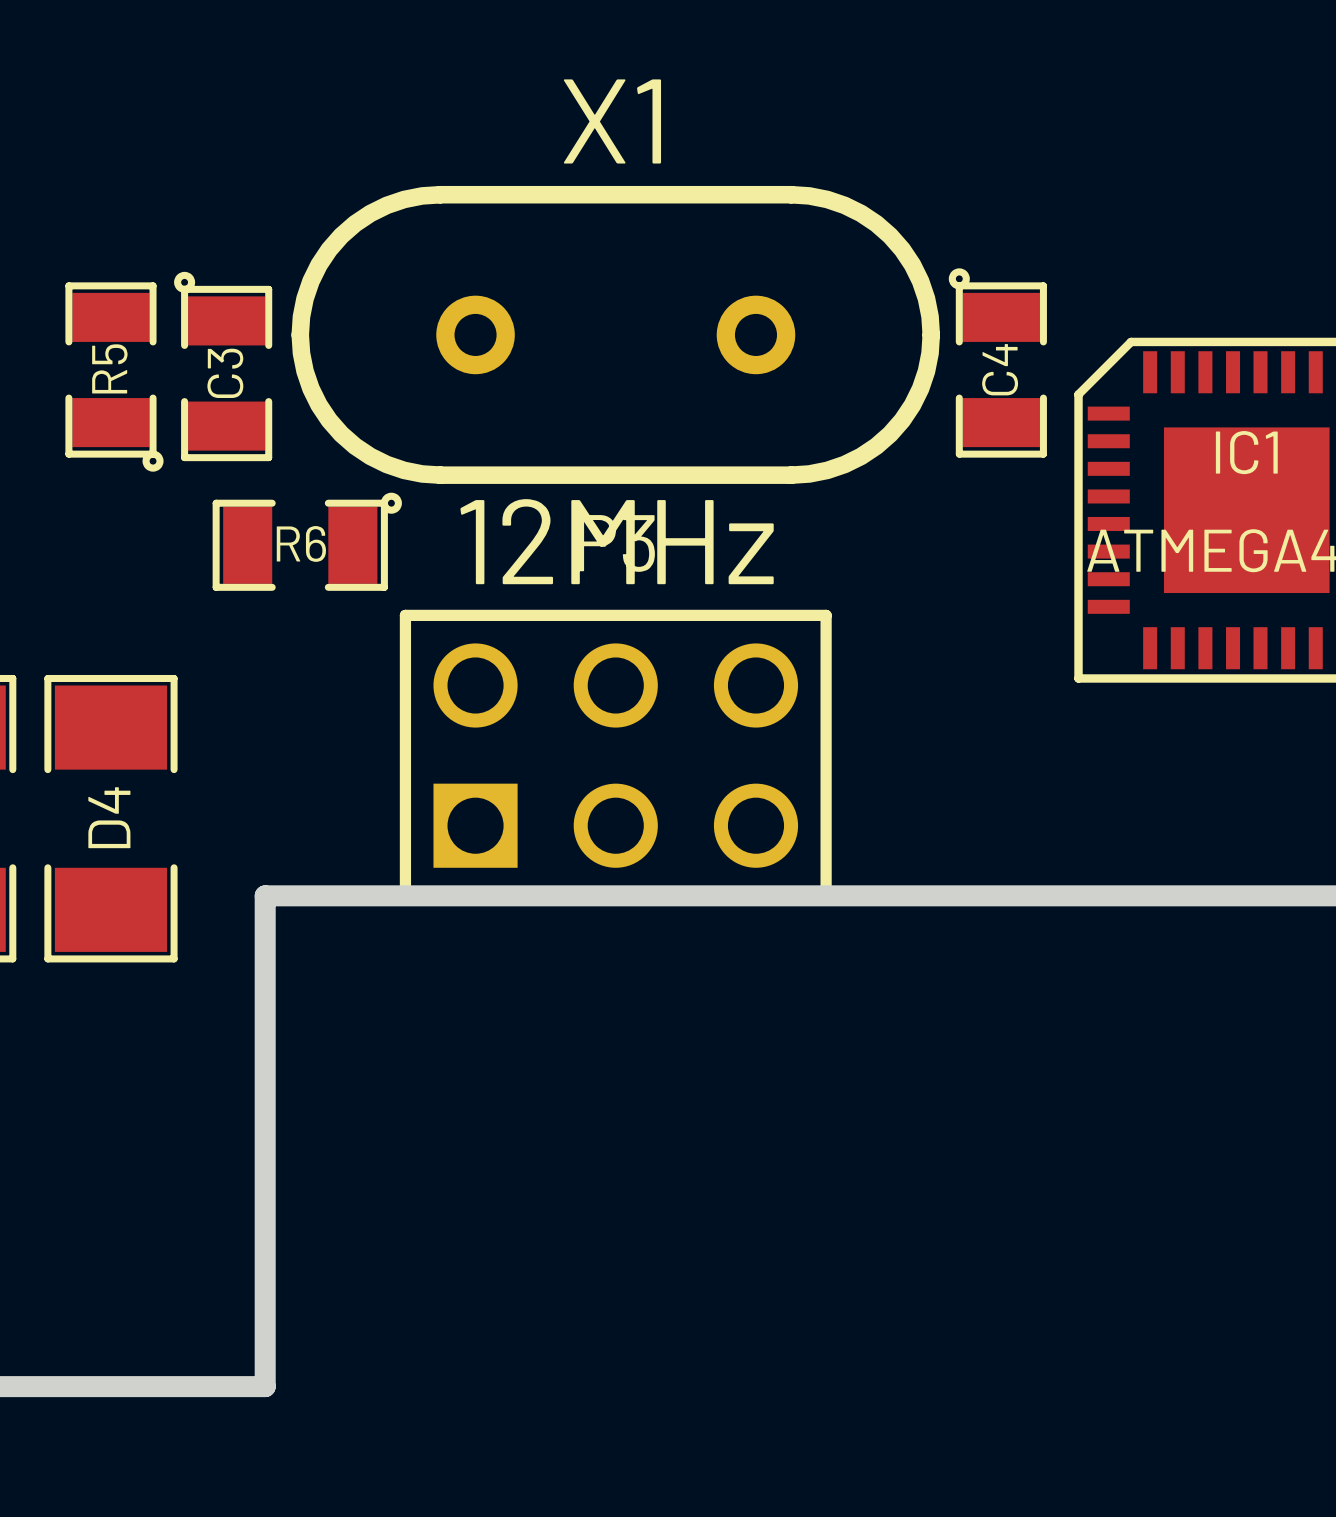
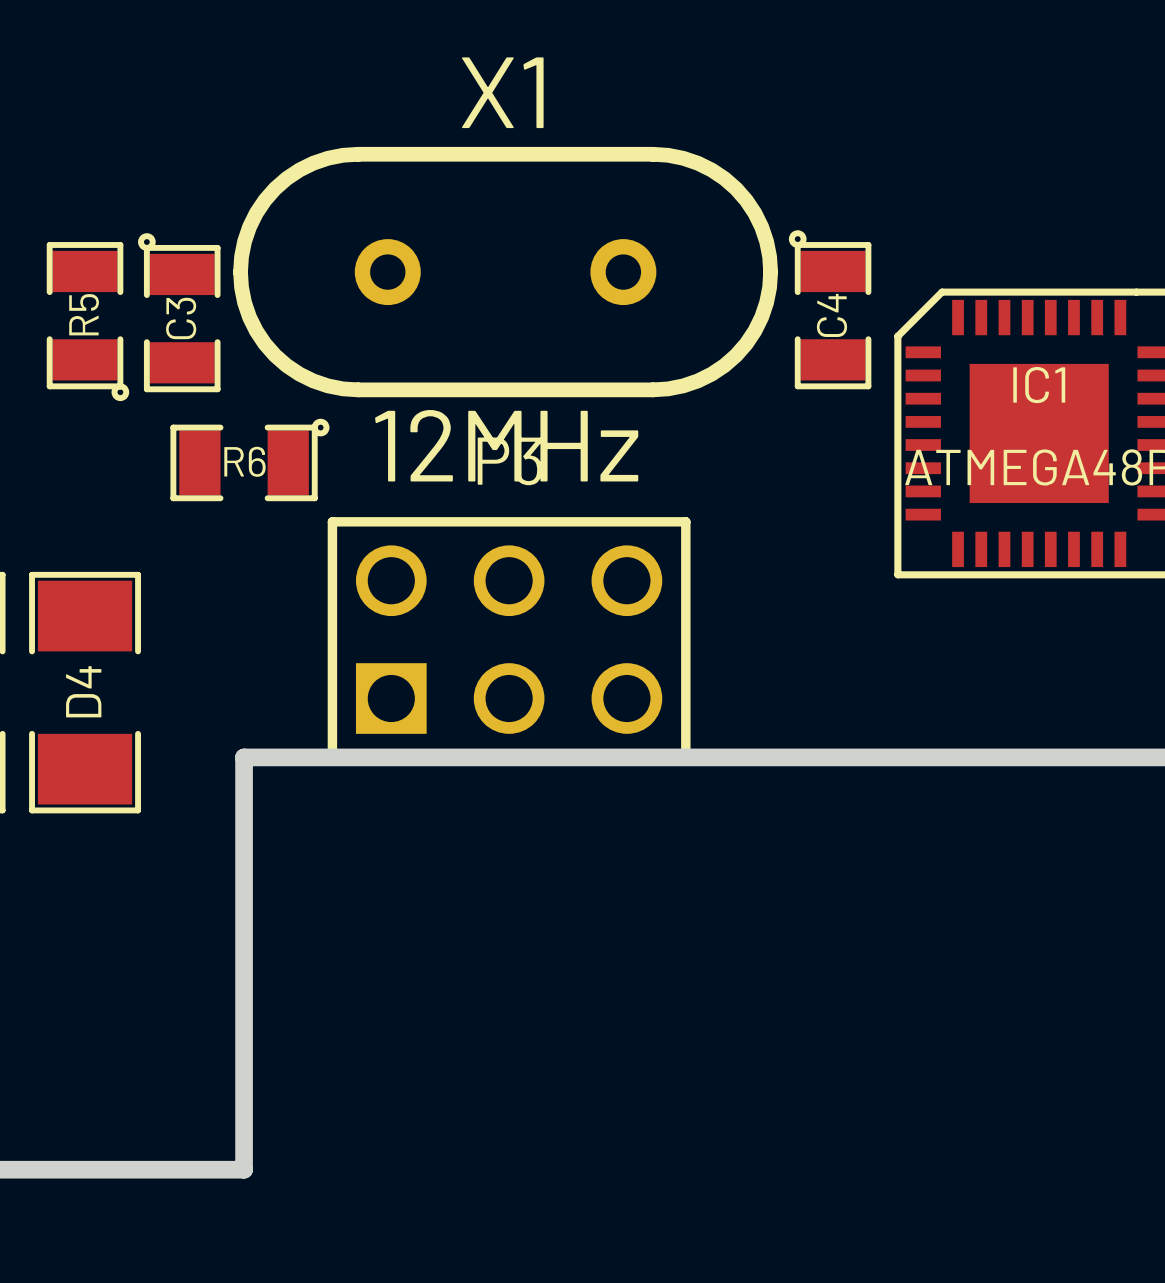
X1 position: (615, 334) -> (505, 272)
board edge: (300, 895) (265, 895) (265, 1386) -> (244, 757) (244, 1169) (214, 1169)

